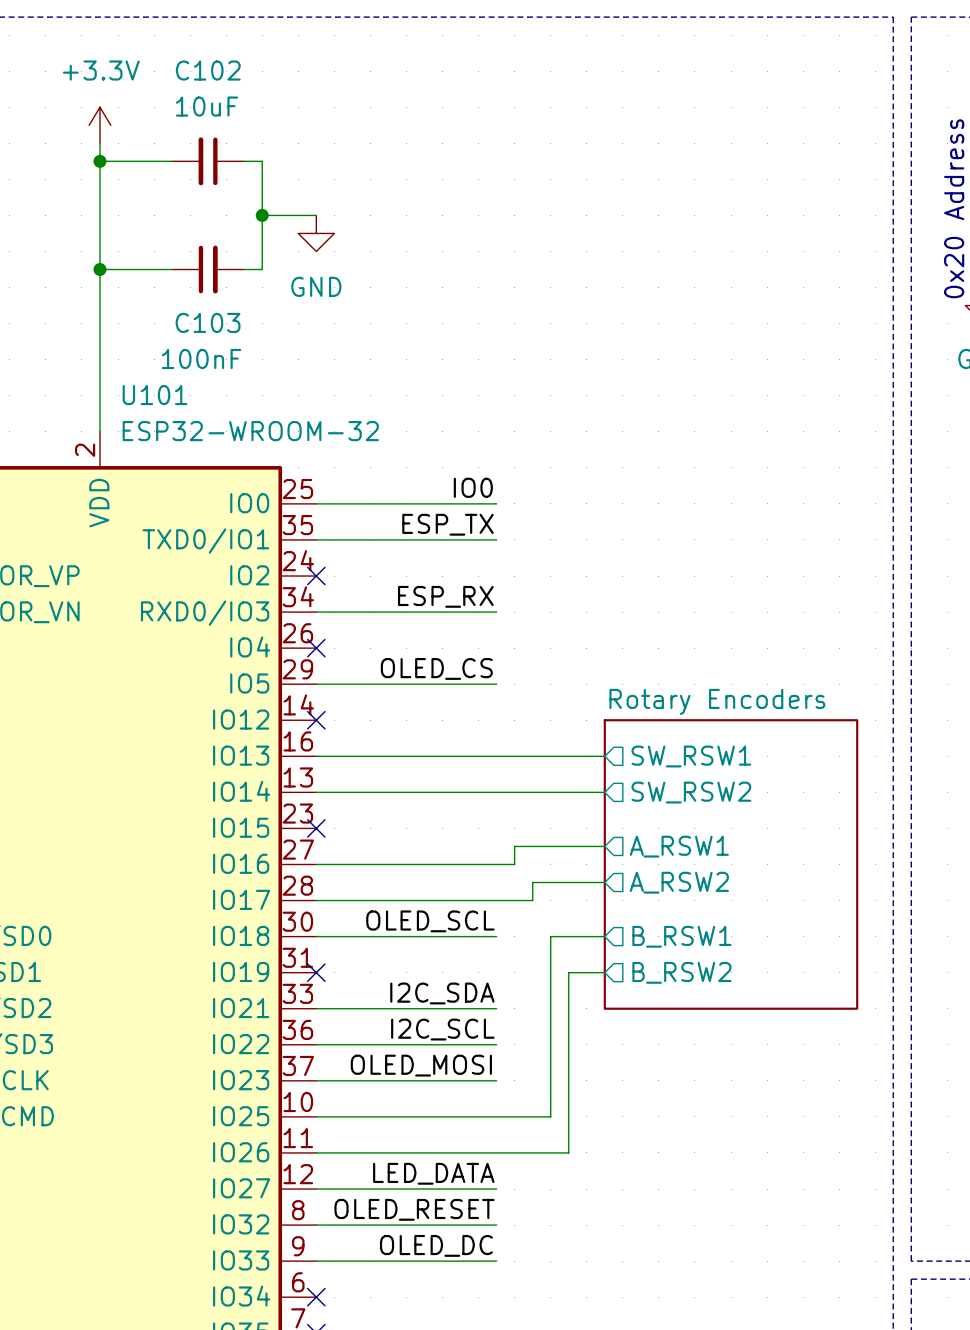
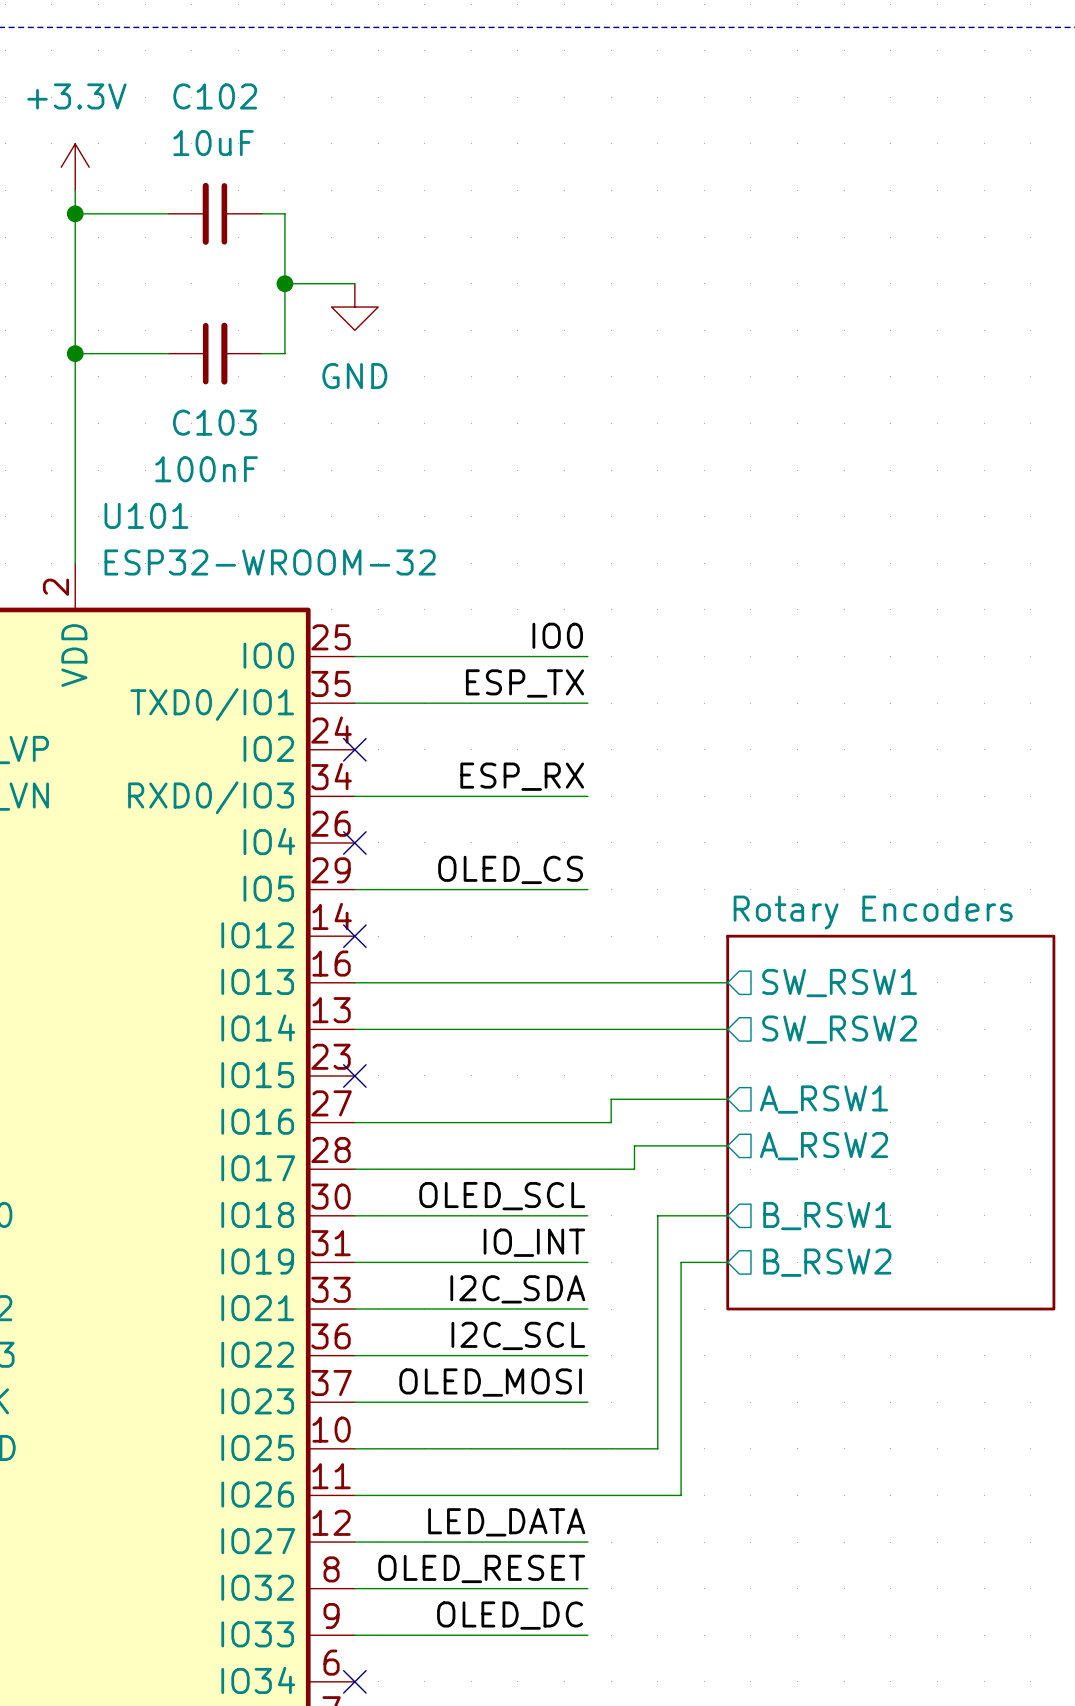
label: none -> IO_INT (534, 1242)
wire: none -> (354, 1262) (587, 1262)
no-connect mark: (316, 972) -> none

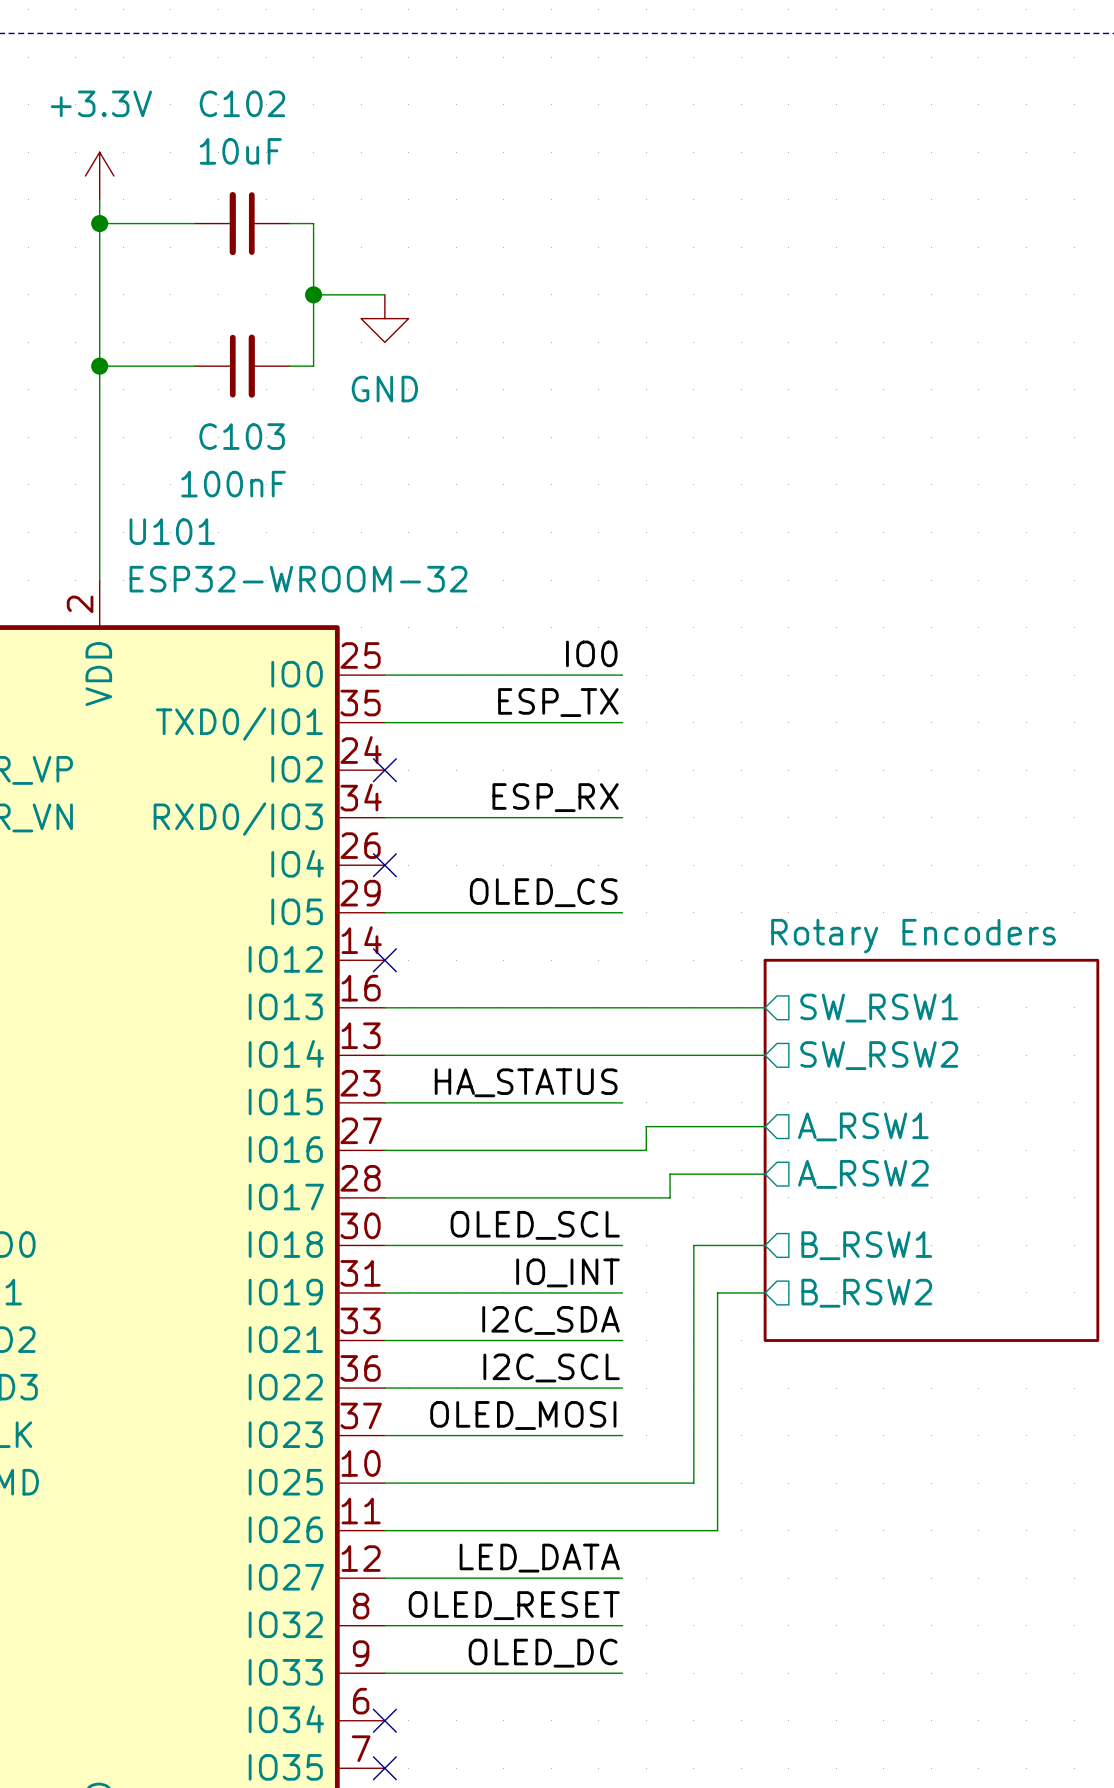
label: none -> HA_STATUS (526, 1082)
wire: none -> (384, 1102) (622, 1102)
no-connect mark: (354, 1075) -> none

